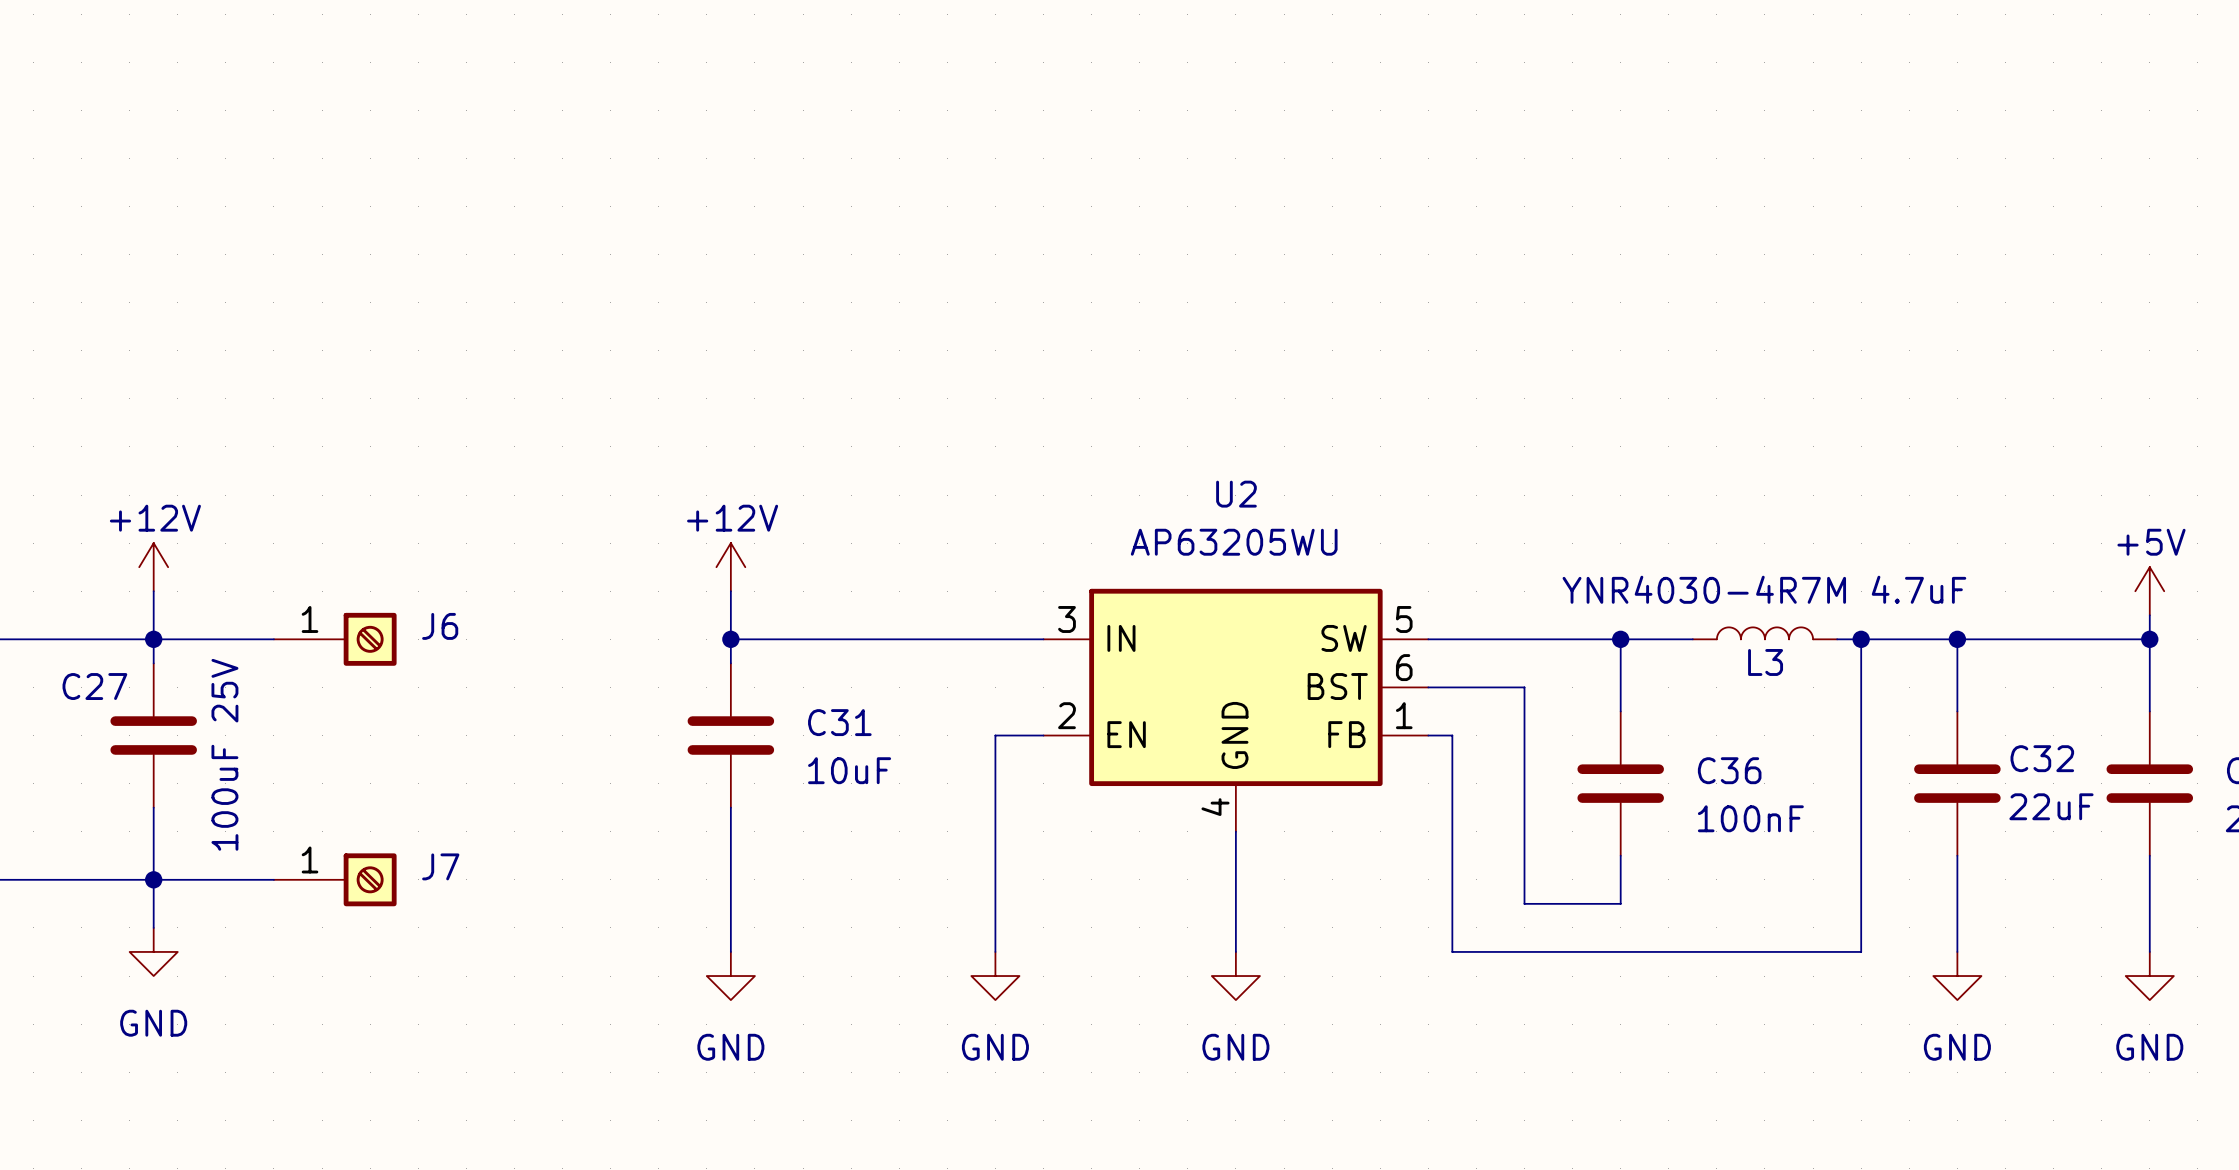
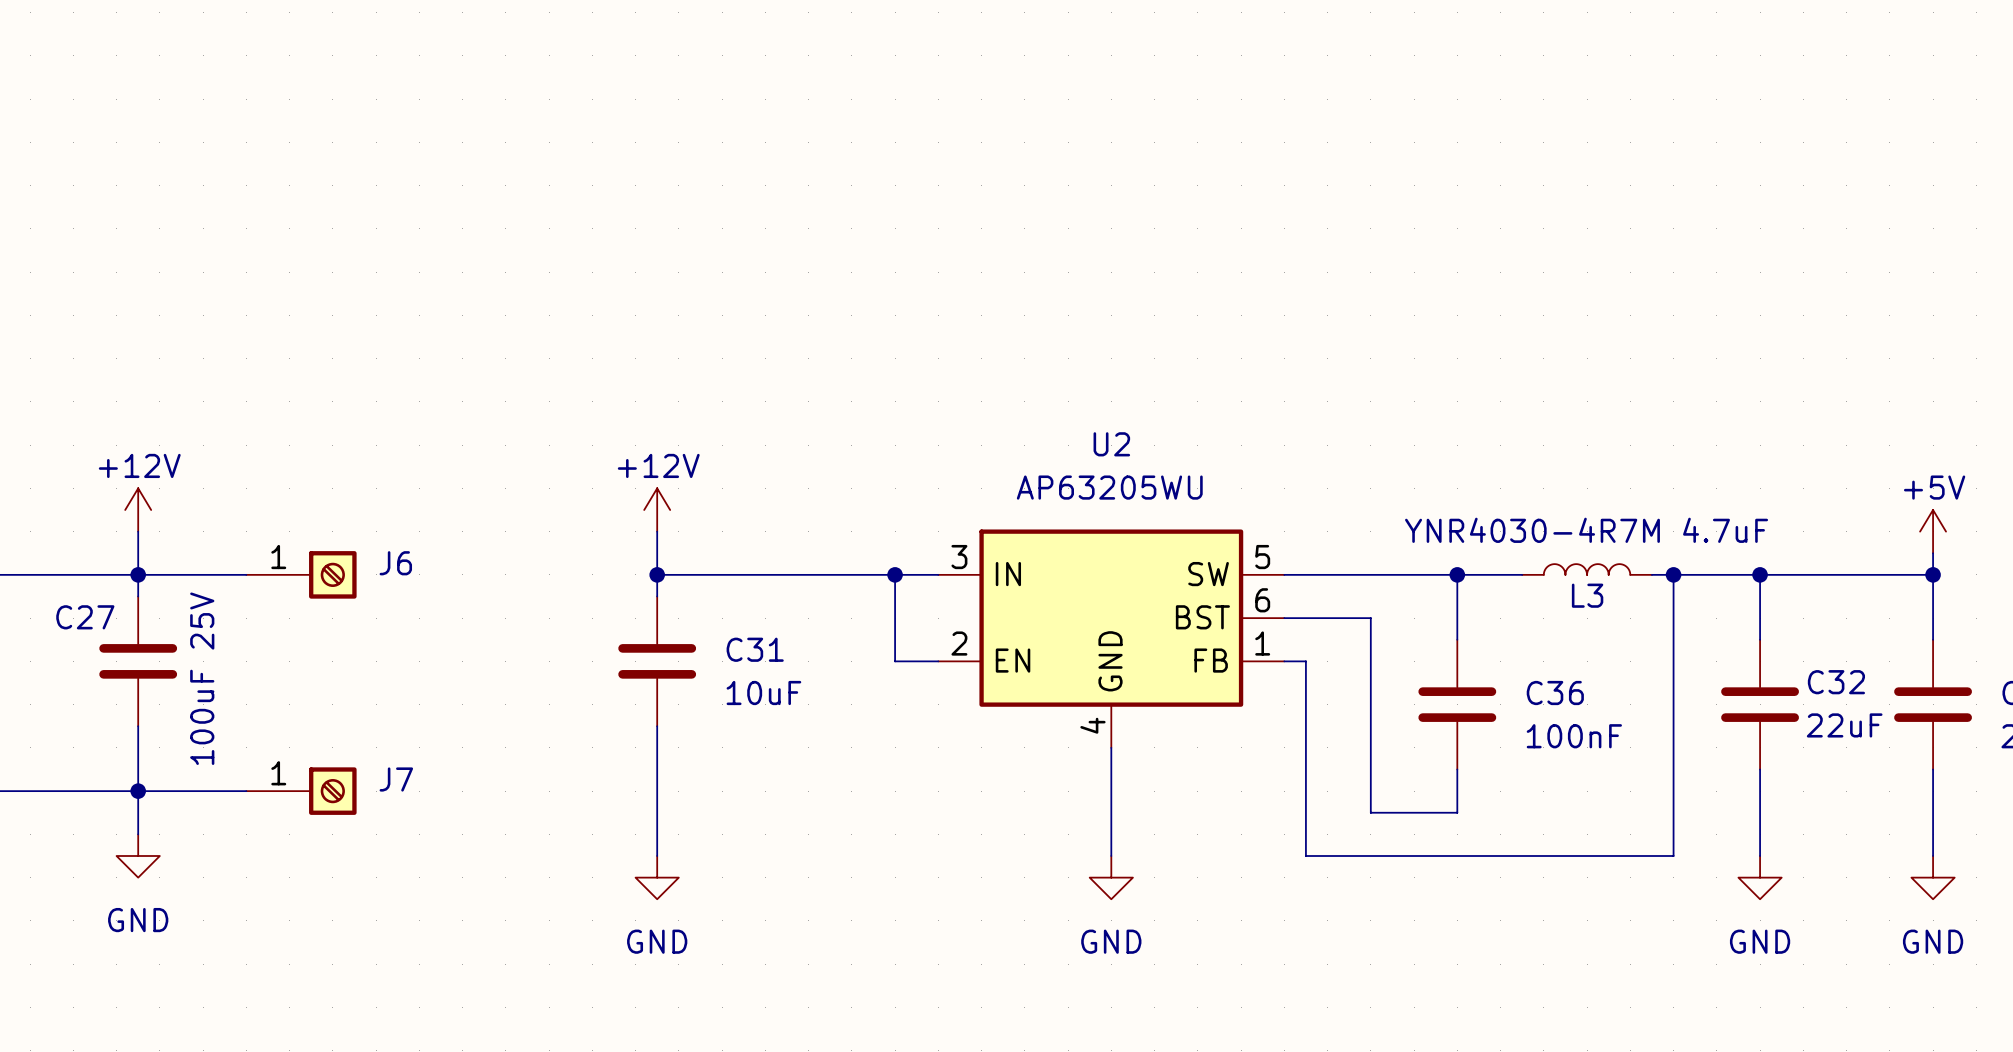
junction: none -> (895, 574)
wire: (995, 735) (995, 951) -> (895, 661) (895, 574)
power symbol: GND (995, 976) -> none

